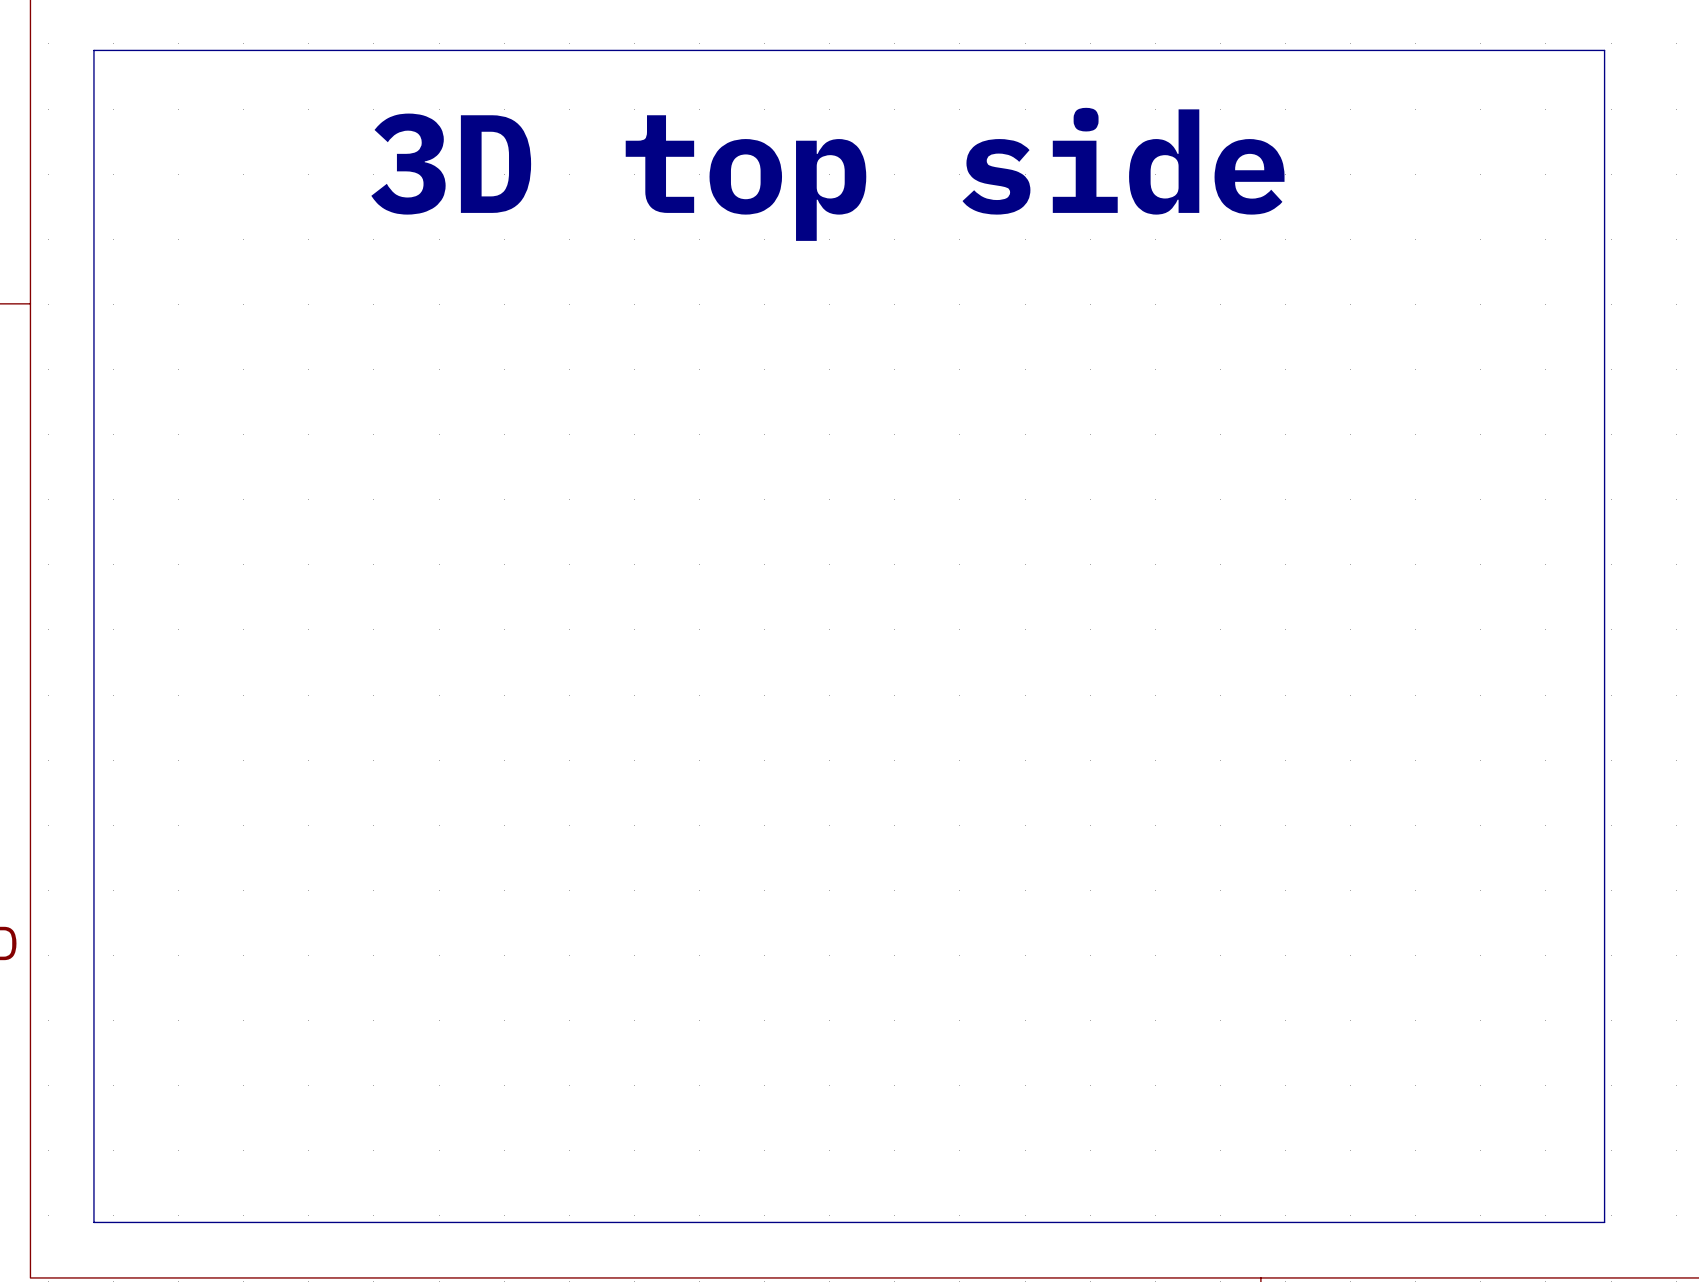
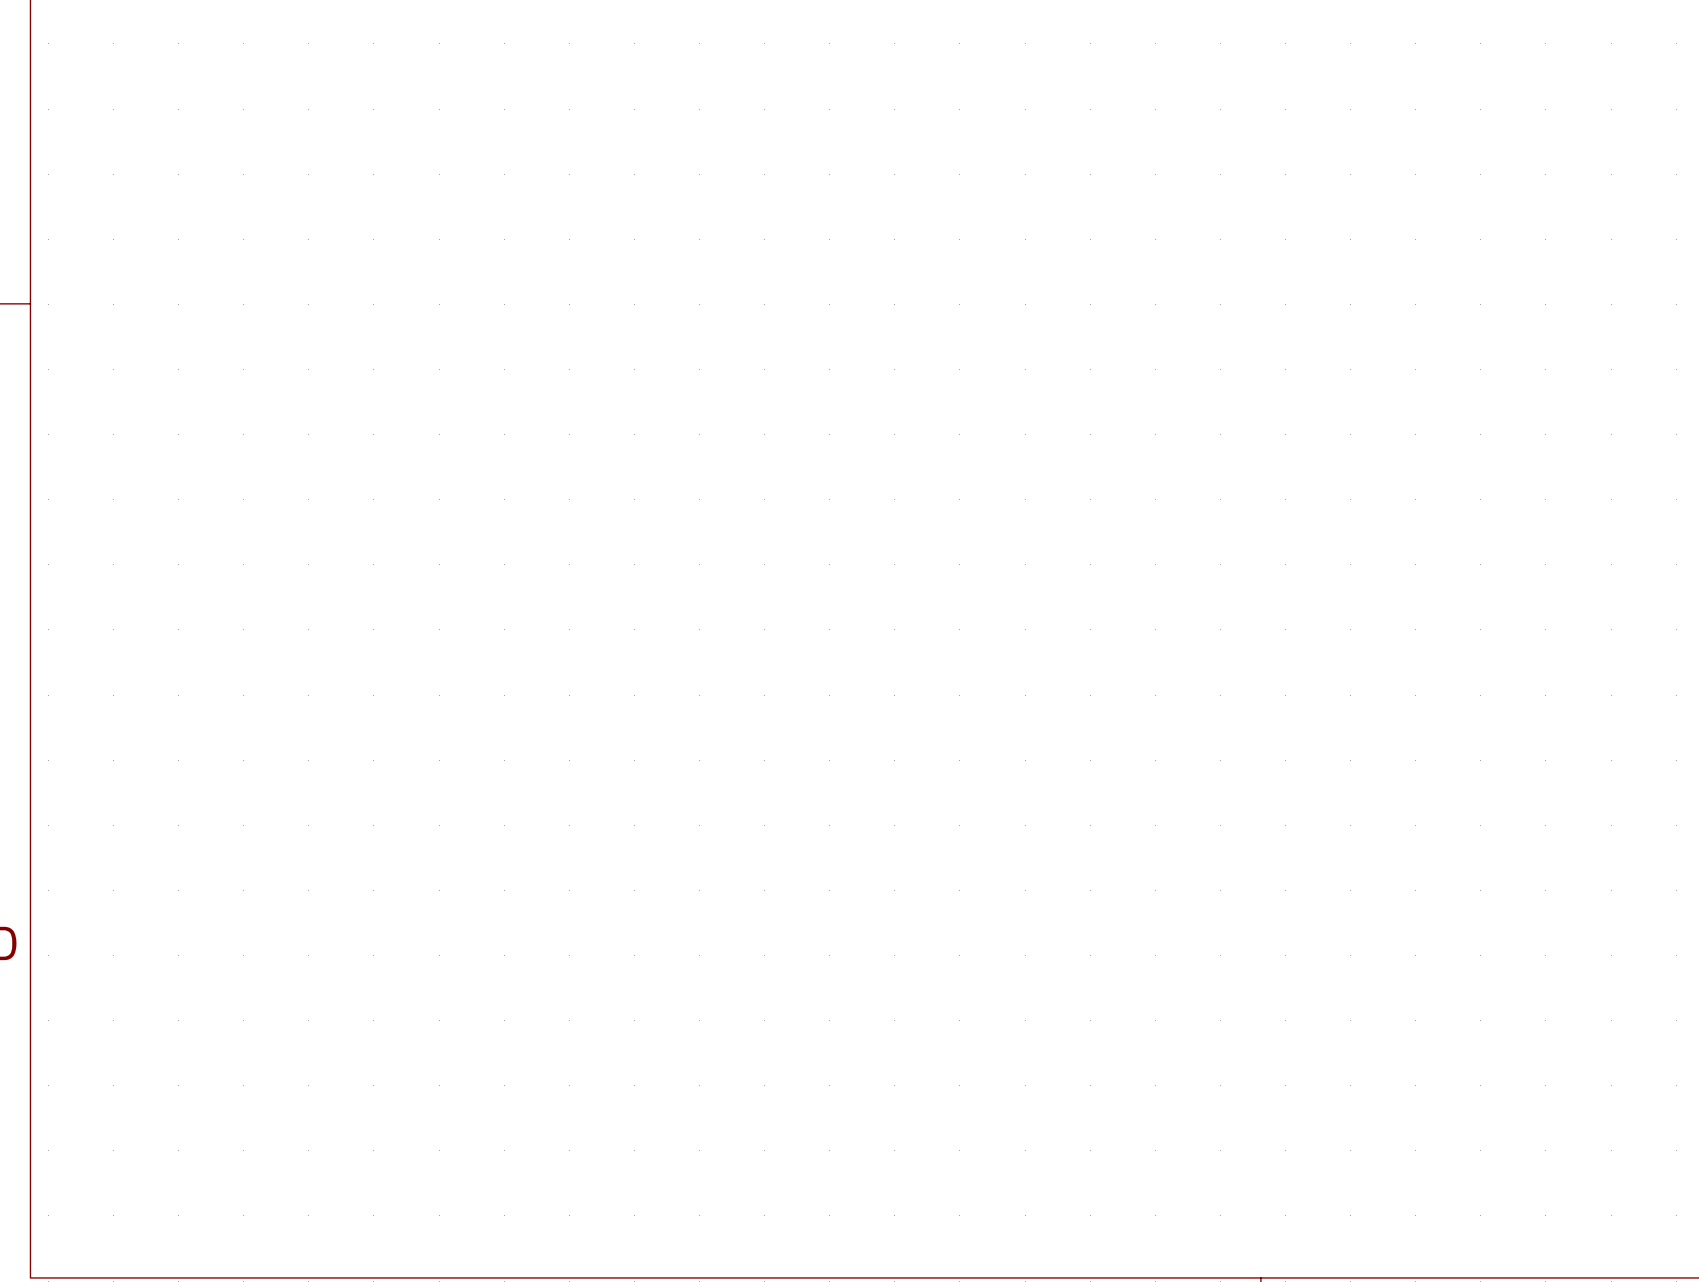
line: (93, 50) (1604, 50) (1604, 1222) (93, 1222) (93, 50) -> none
text: 3D top side (827, 174) -> none

